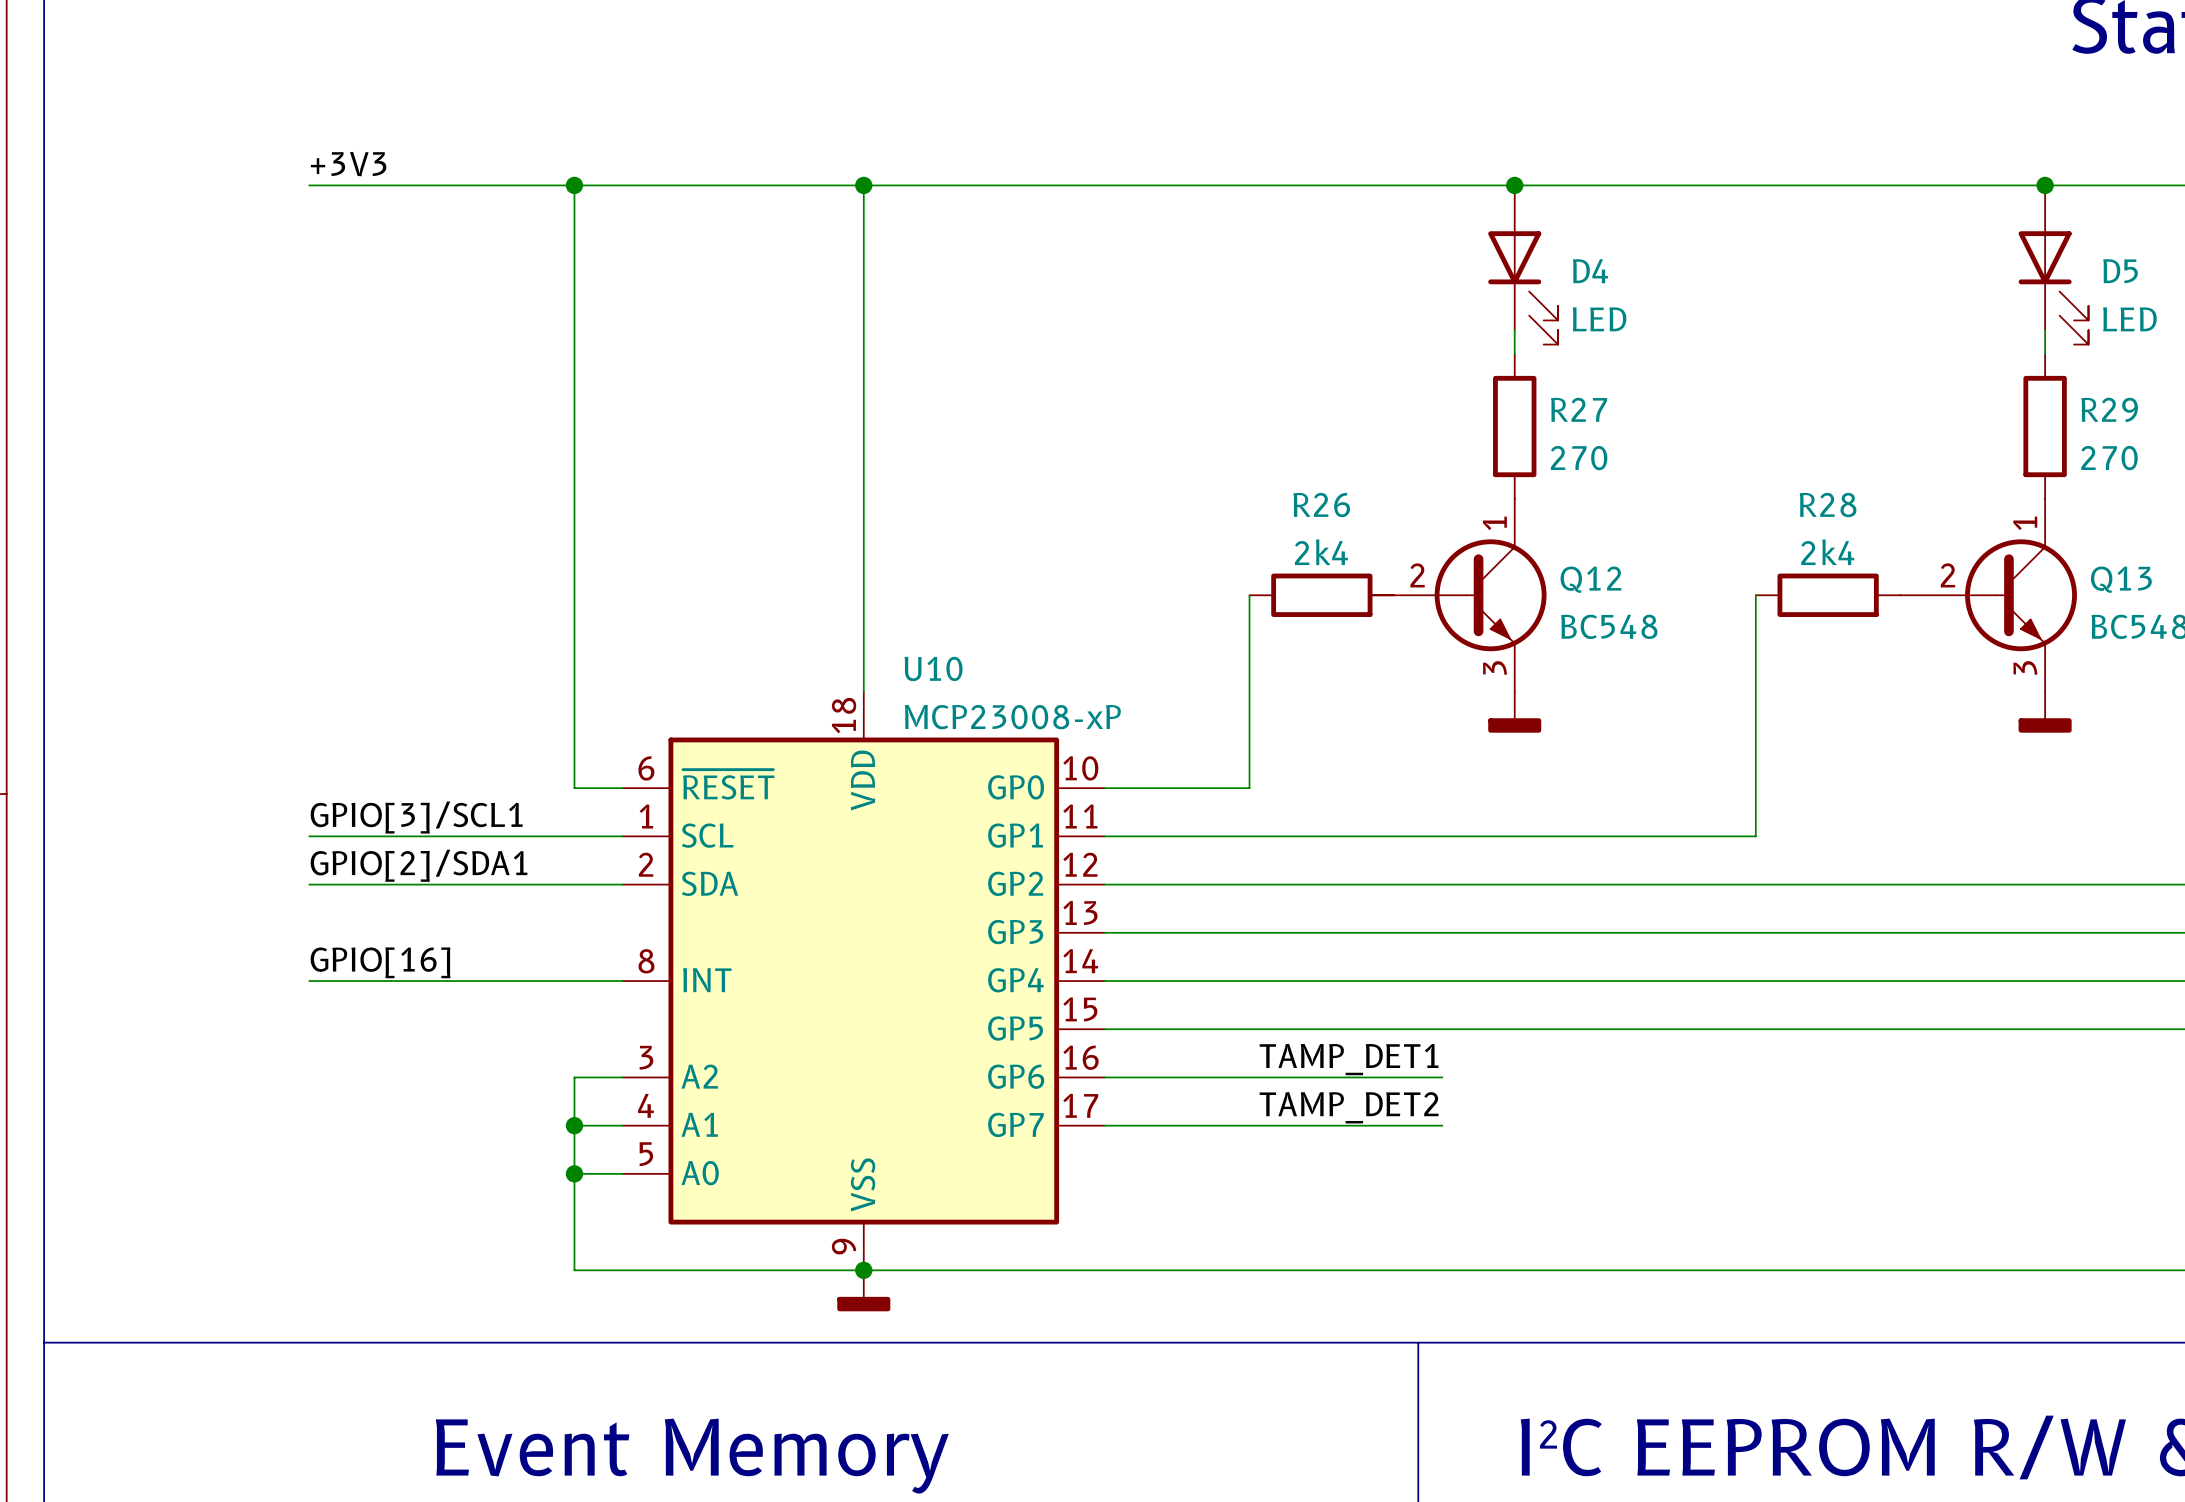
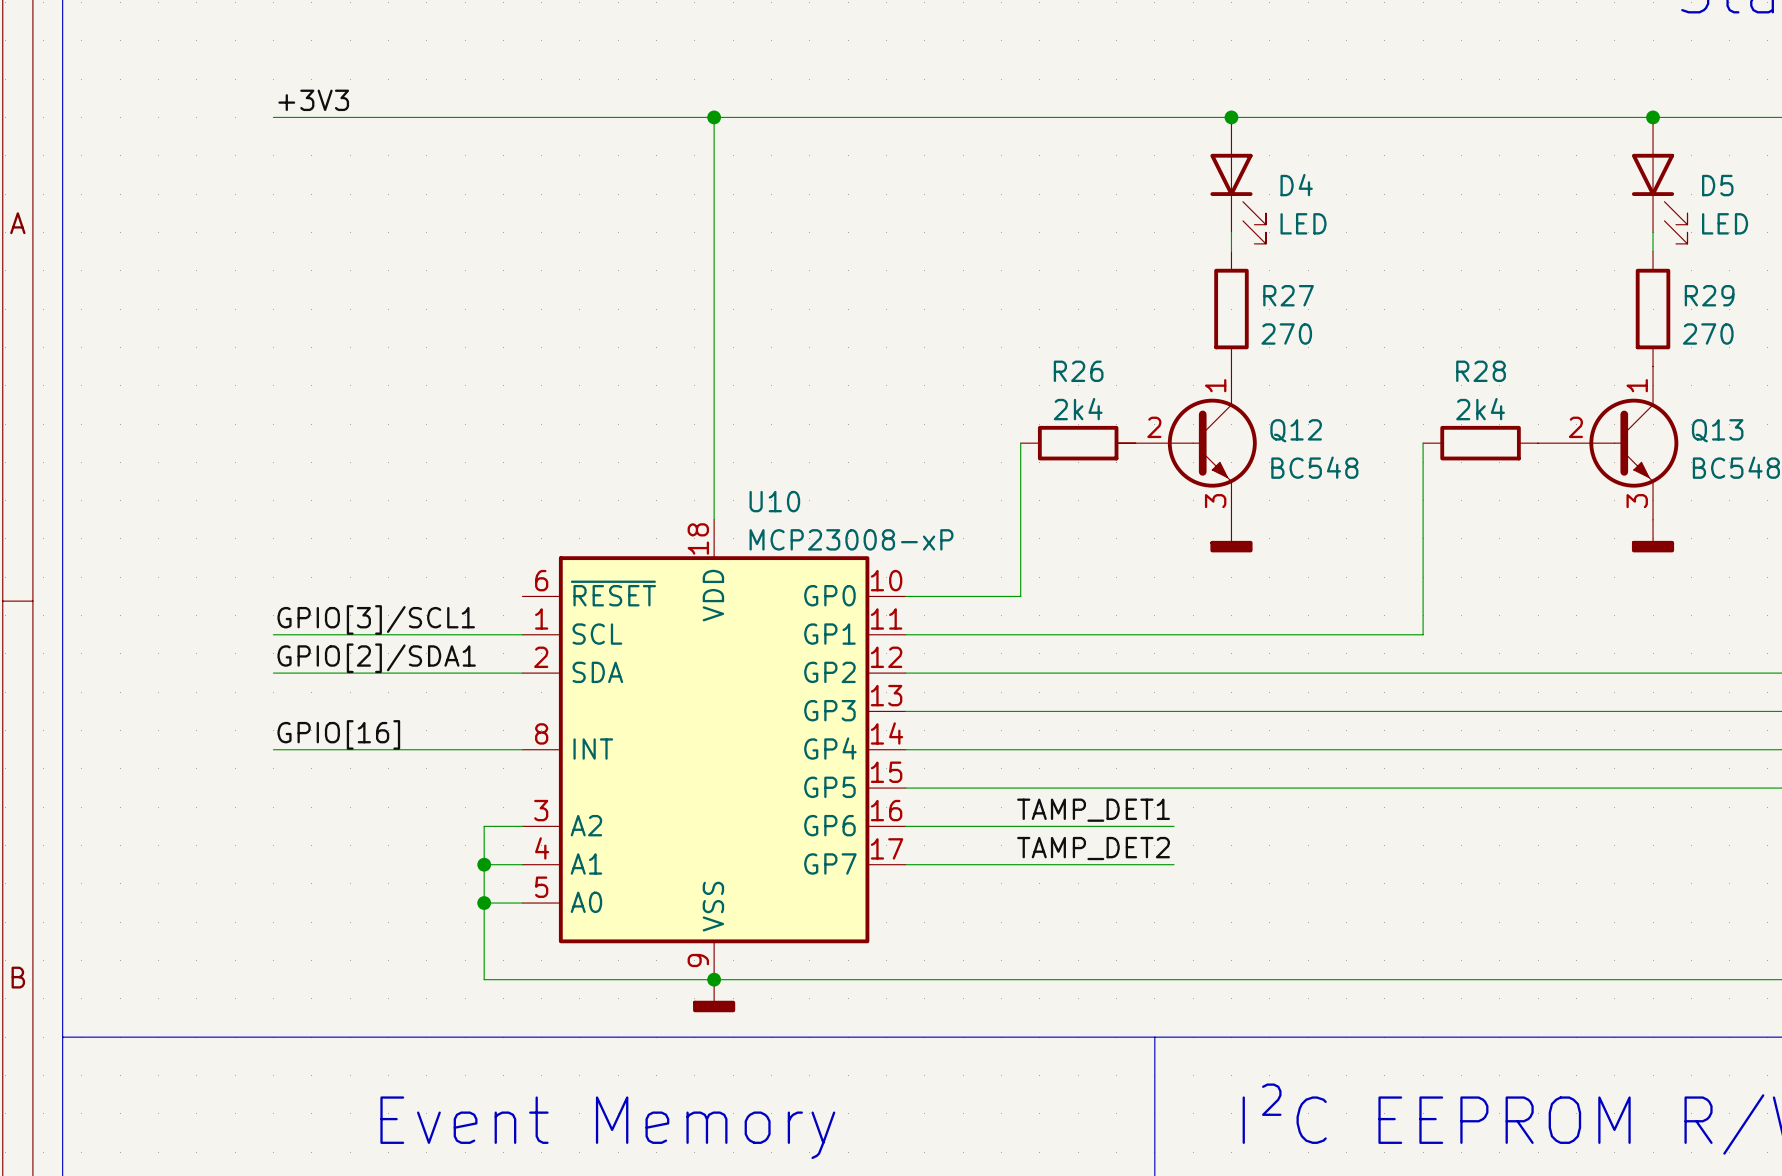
wire: (574, 185) (574, 788) (622, 788) -> none
junction: (574, 185) -> none

